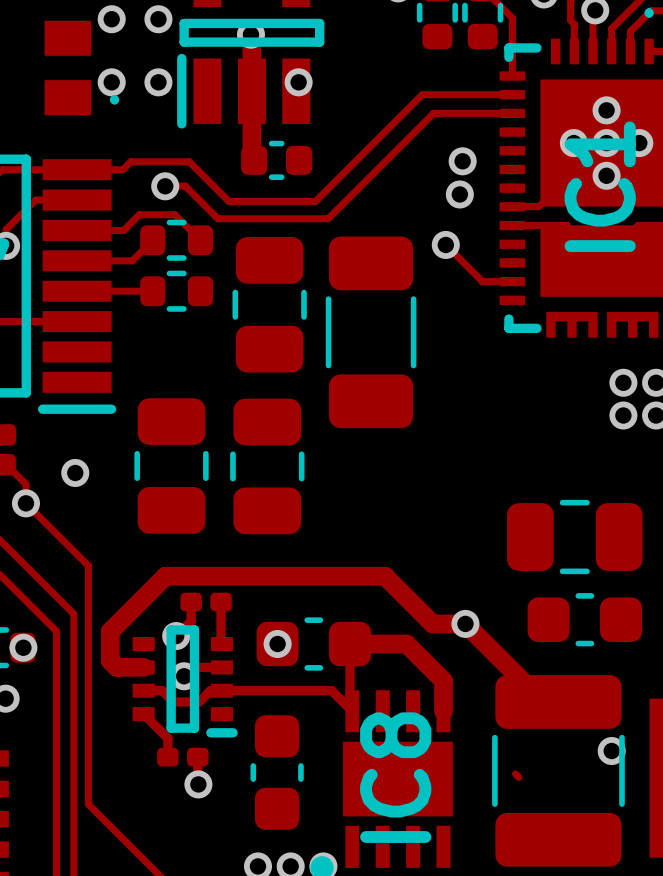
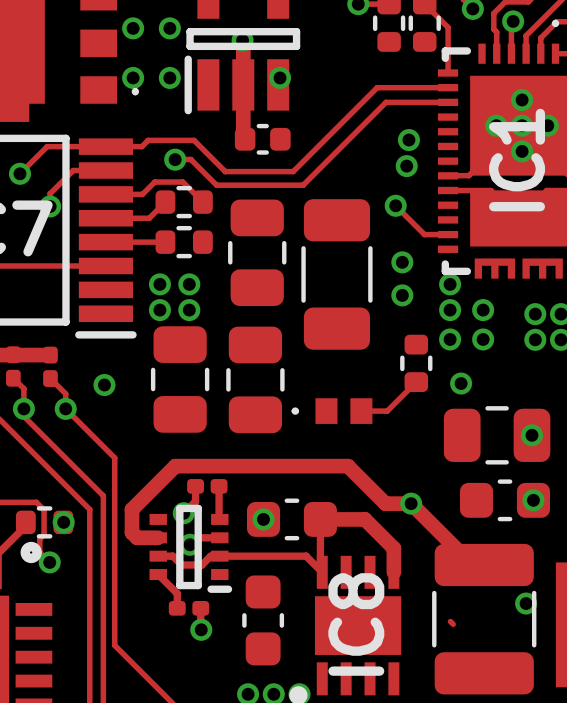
via: none -> (402, 262)
via: none -> (159, 284)
via: none -> (189, 284)
via: none -> (450, 284)
via: none -> (402, 295)
via: none -> (159, 310)
via: none -> (189, 310)
via: none -> (450, 310)
via: none -> (483, 310)
via: none -> (450, 339)
via: none -> (483, 339)
part: none -> (416, 363)
track: none -> (416, 382) (387, 411) (361, 411)
via: none -> (461, 383)
part: none -> (332, 411)
via: none -> (531, 435)
via: none -> (533, 500)

